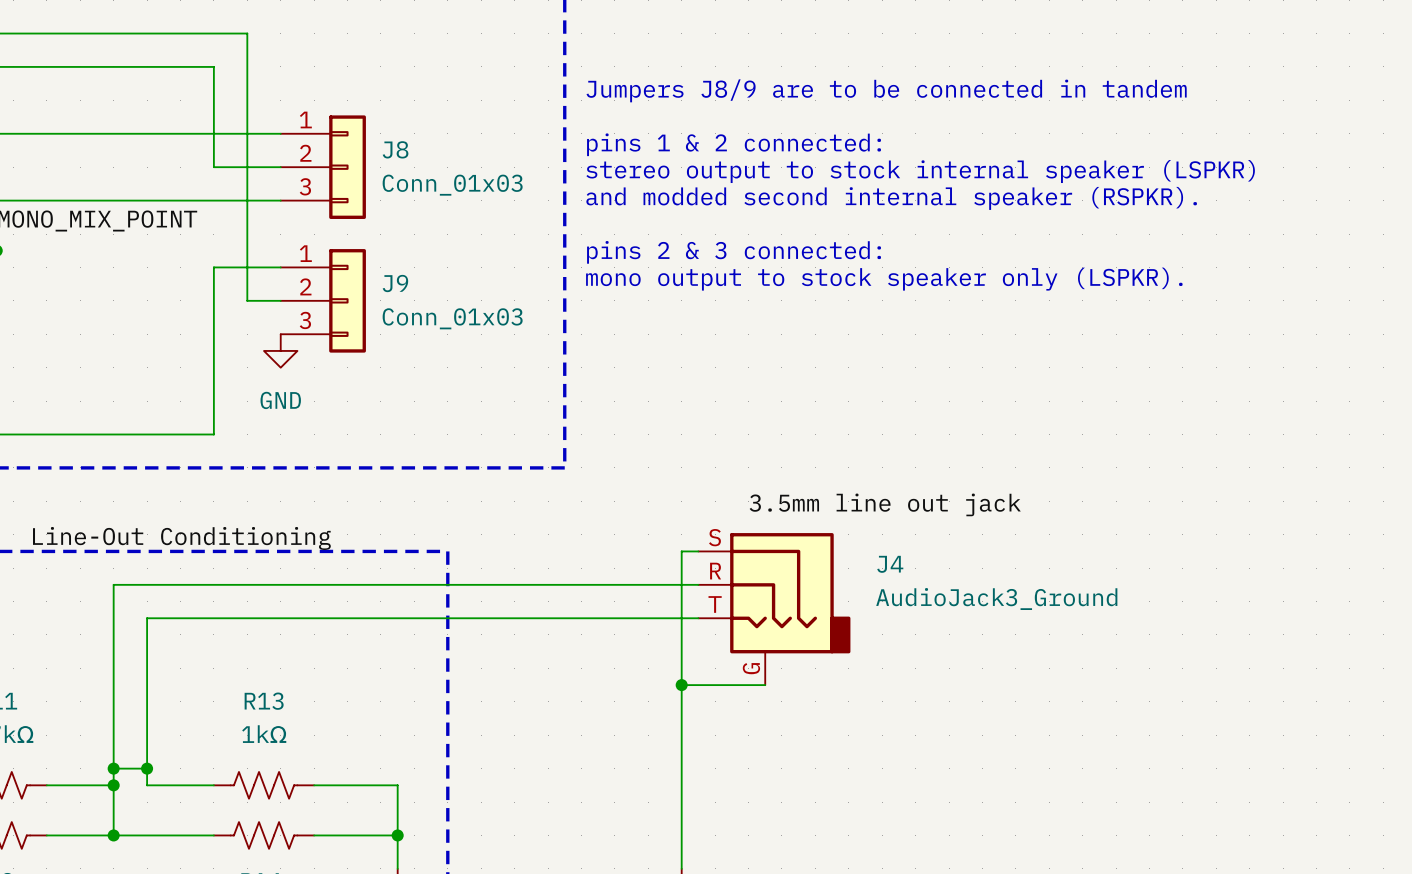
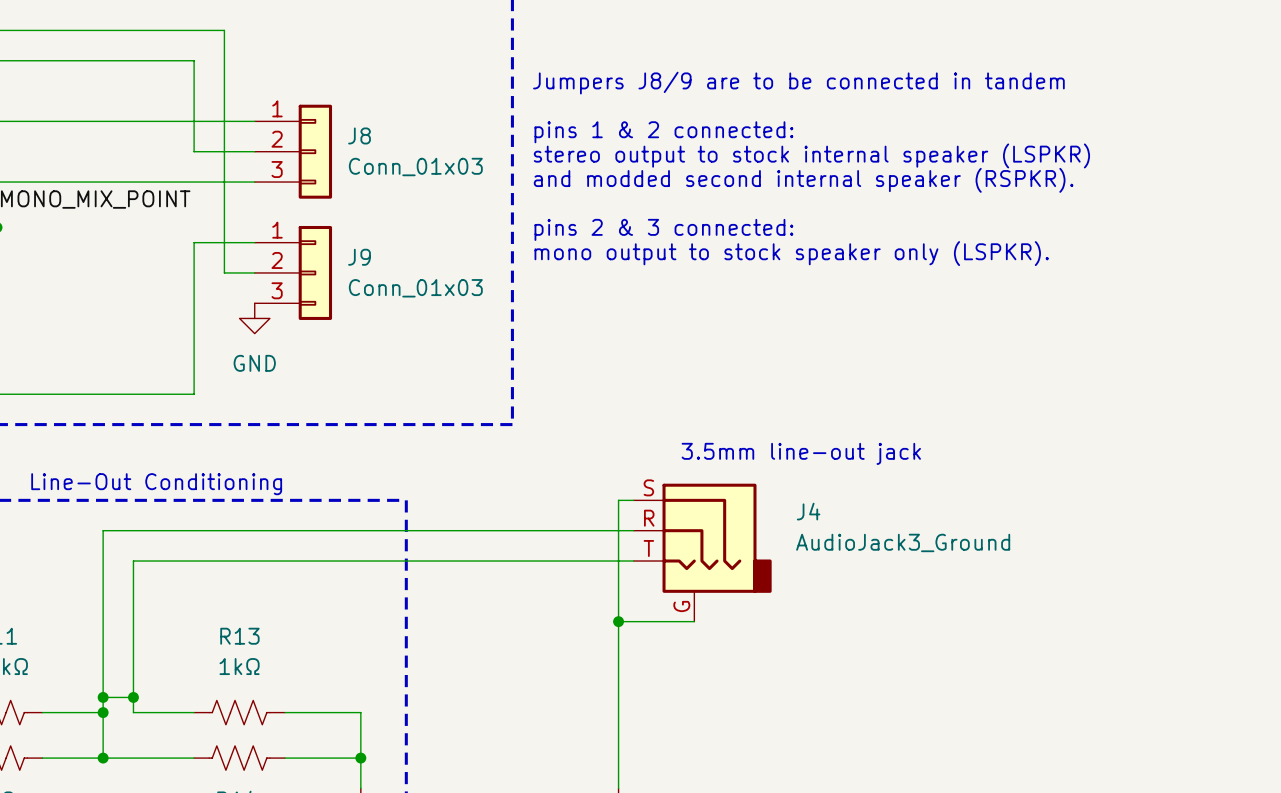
text: none -> 3.5mm line-out jack (801, 453)
label: 3.5mm line out jack (885, 504) -> none
text: none -> Line-Out Conditioning (156, 484)
label: Line-Out Conditioning (181, 538) -> none

